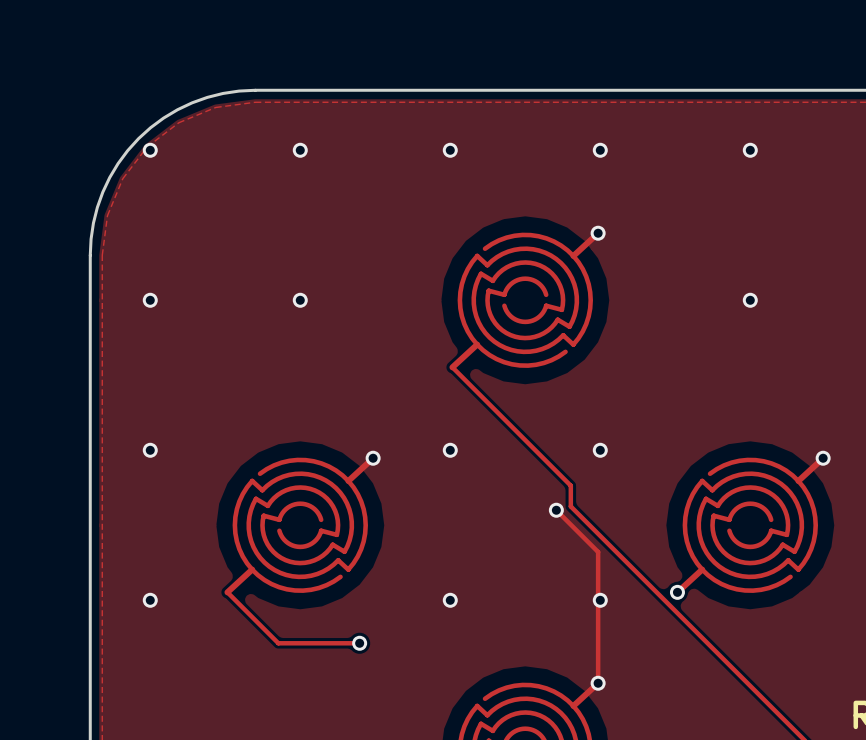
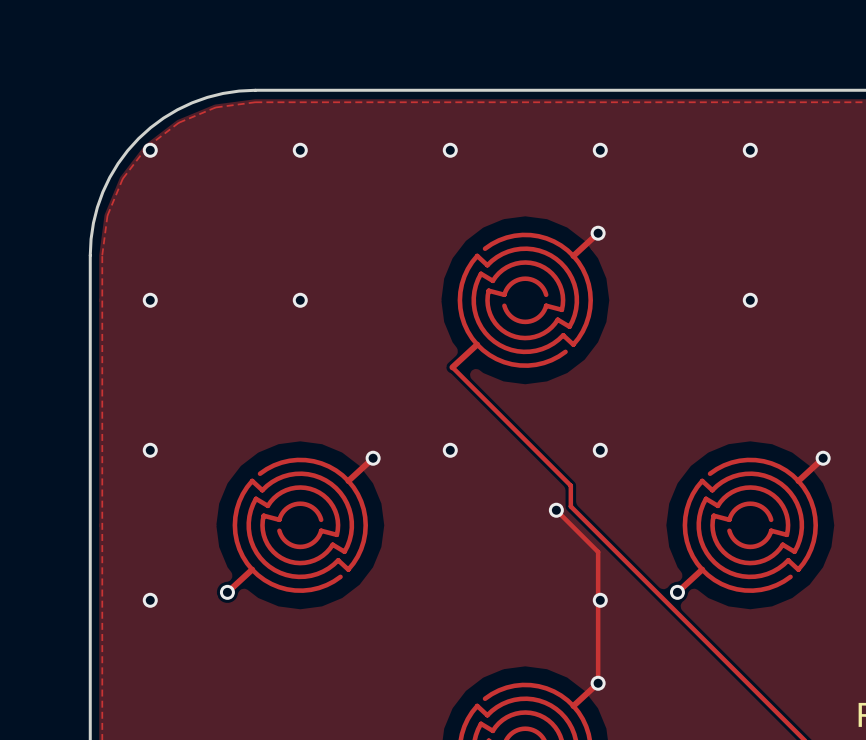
track: (227, 592) (278, 643) (359, 643) -> none
via: none -> (227, 592)
via: (450, 600) -> none
via: (359, 643) -> none

